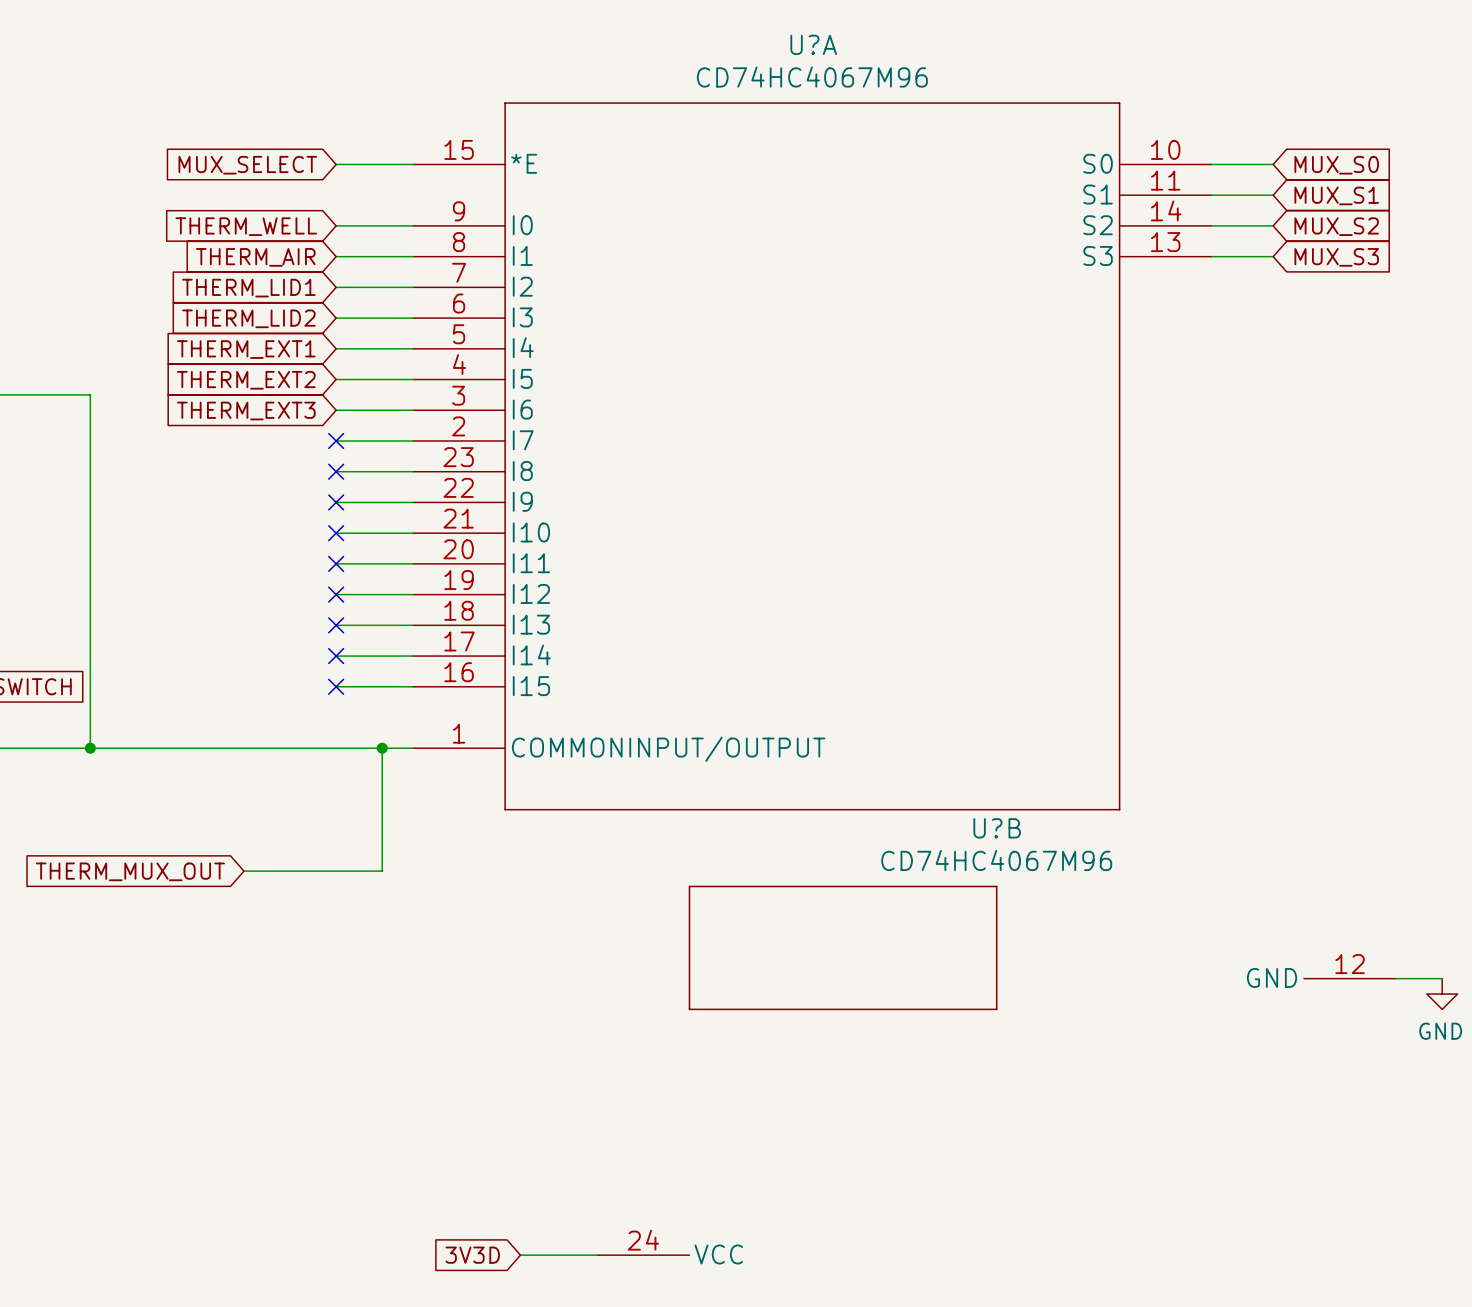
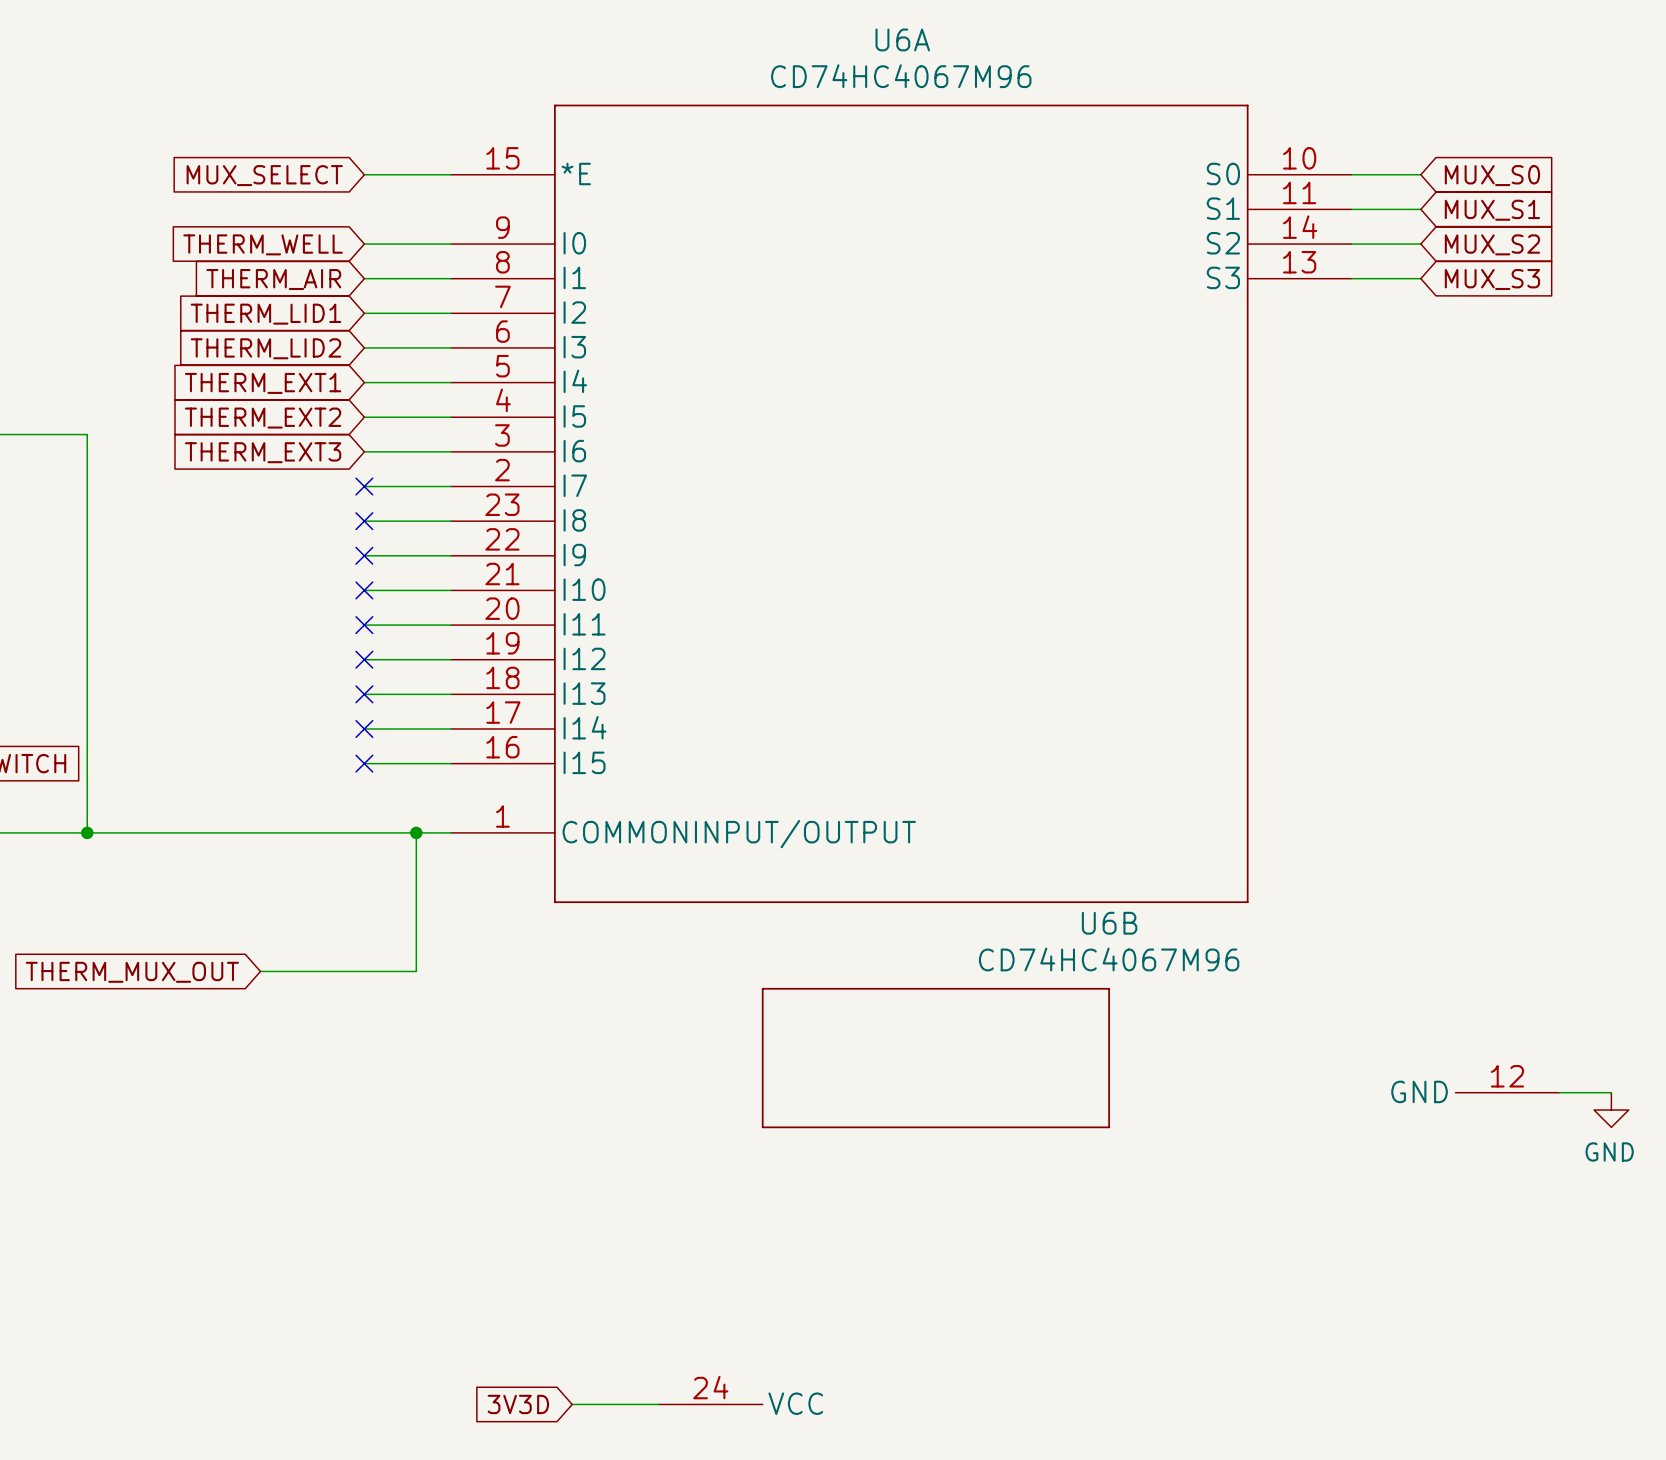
U?A name: U?A (813, 44) -> U6A (902, 39)
U?B name: U?B (997, 828) -> U6B (1109, 923)

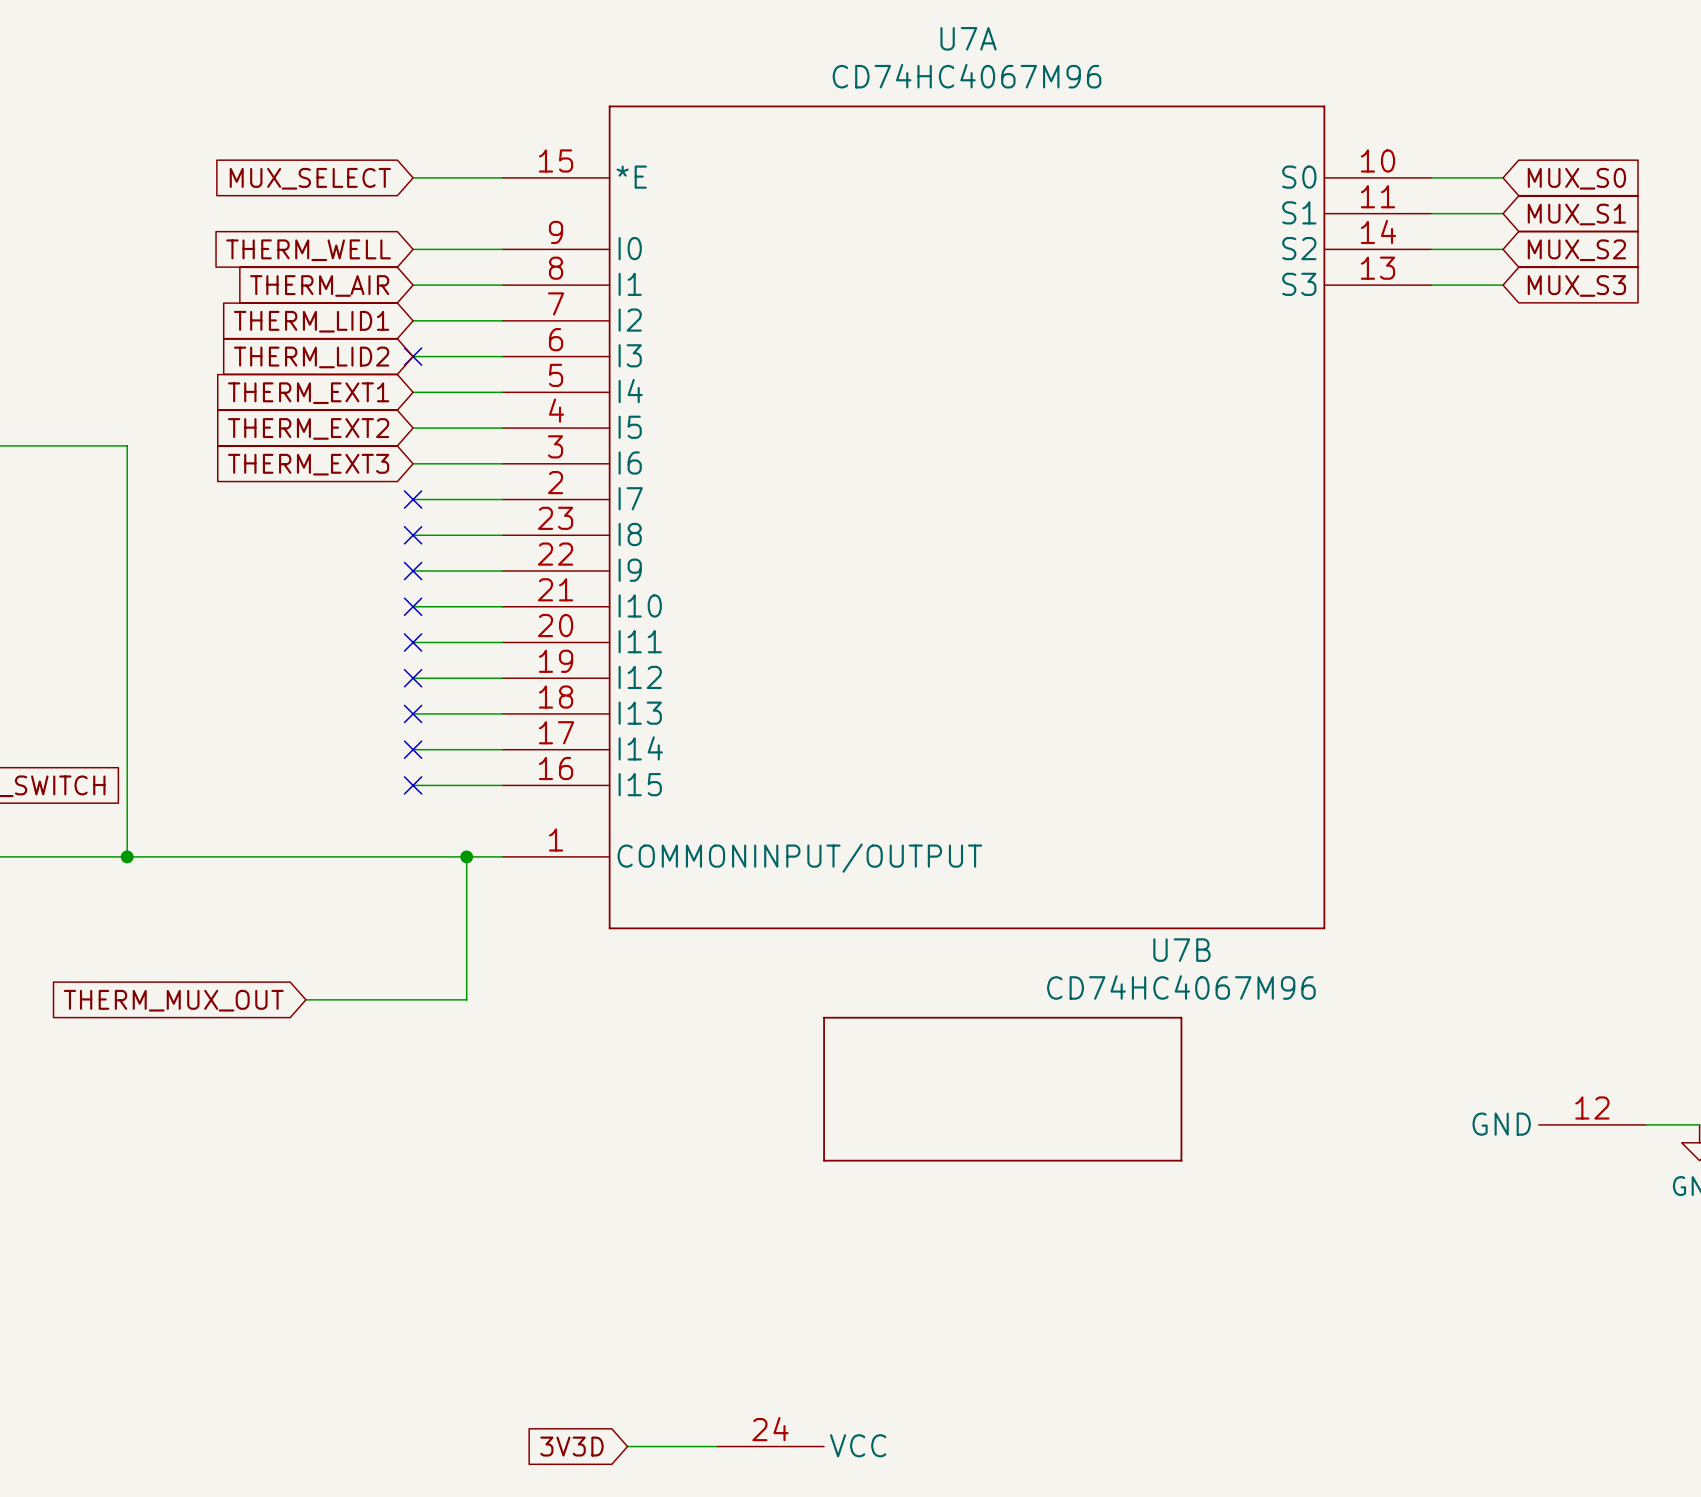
U6A name: U6A (902, 39) -> U7A (968, 38)
no-connect mark: none -> (413, 356)
U6B name: U6B (1109, 923) -> U7B (1181, 950)

